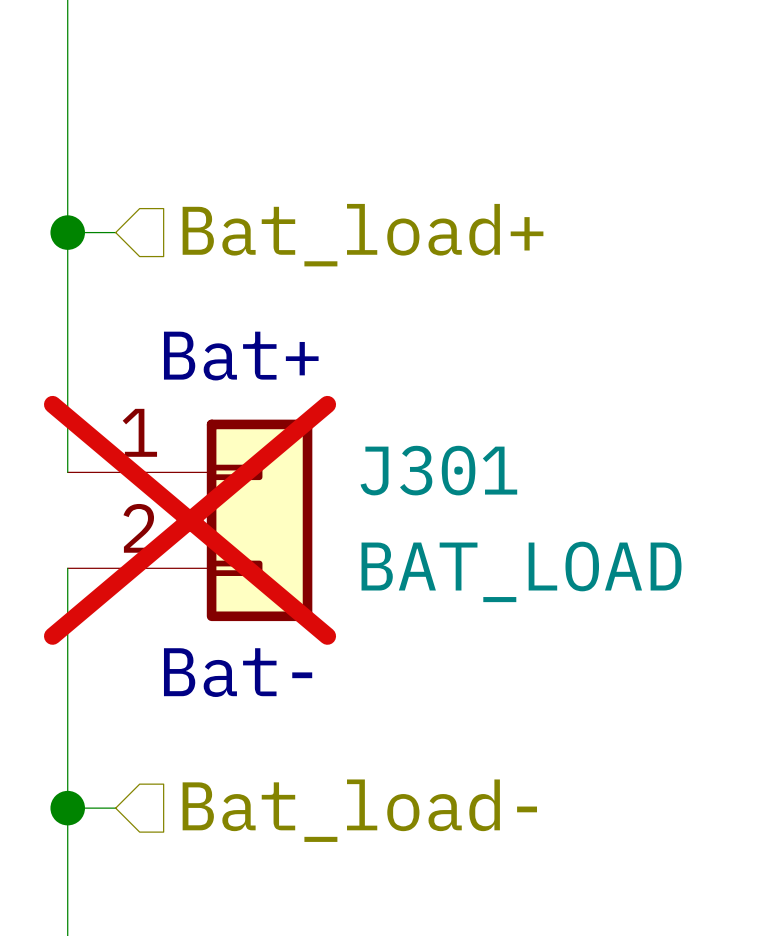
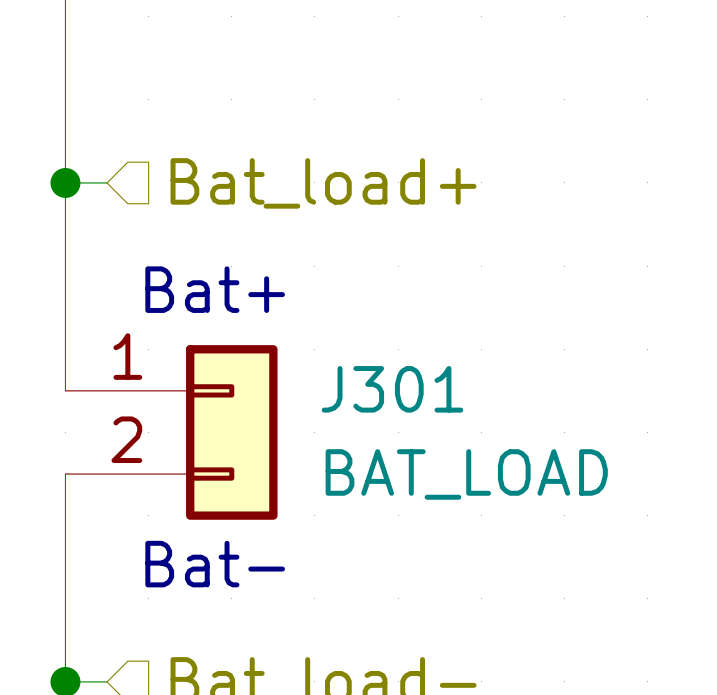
J301 do-not-place cross: (190, 520) -> none

